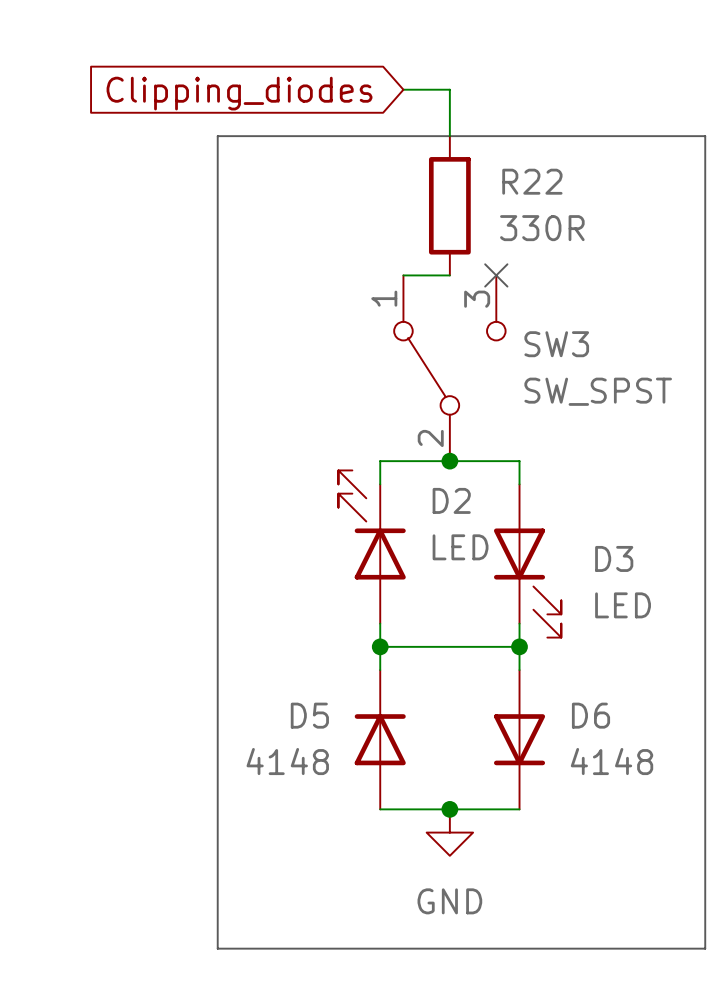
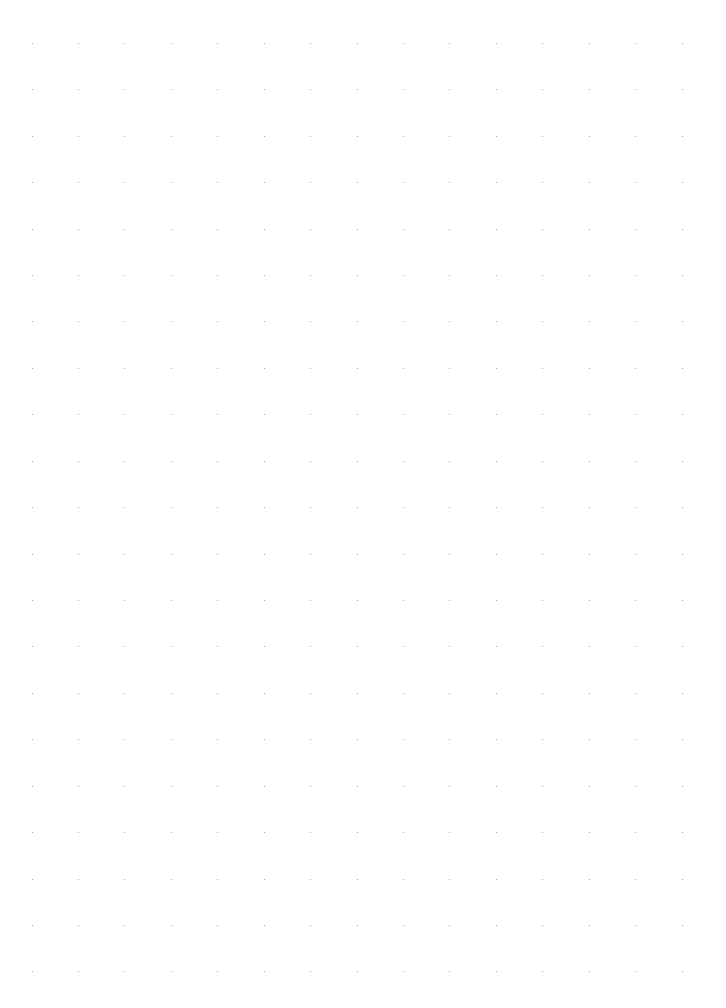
wire: (403, 89) (449, 89) (449, 136) -> none
global label: Clipping_diodes (239, 93) -> none
line: (217, 136) (705, 136) (705, 948) (217, 948) (217, 136) -> none
R22: 330R (449, 205) -> none
wire: (403, 275) (449, 275) -> none
no-connect mark: (496, 275) -> none
SW3: SW_SPST (449, 368) -> none
junction: (449, 461) -> none
wire: (380, 484) (380, 461) (519, 461) (519, 484) -> none
D2: LED (372, 547) -> none
D3: LED (527, 560) -> none
wire: (380, 623) (380, 670) -> none
wire: (519, 623) (519, 670) -> none
wire: (380, 646) (519, 646) -> none
junction: (380, 646) -> none
junction: (519, 646) -> none
D5: 4148 (380, 739) -> none
D6: 4148 (519, 739) -> none
wire: (380, 809) (519, 809) -> none
junction: (449, 809) -> none
power symbol: GND (449, 832) -> none

